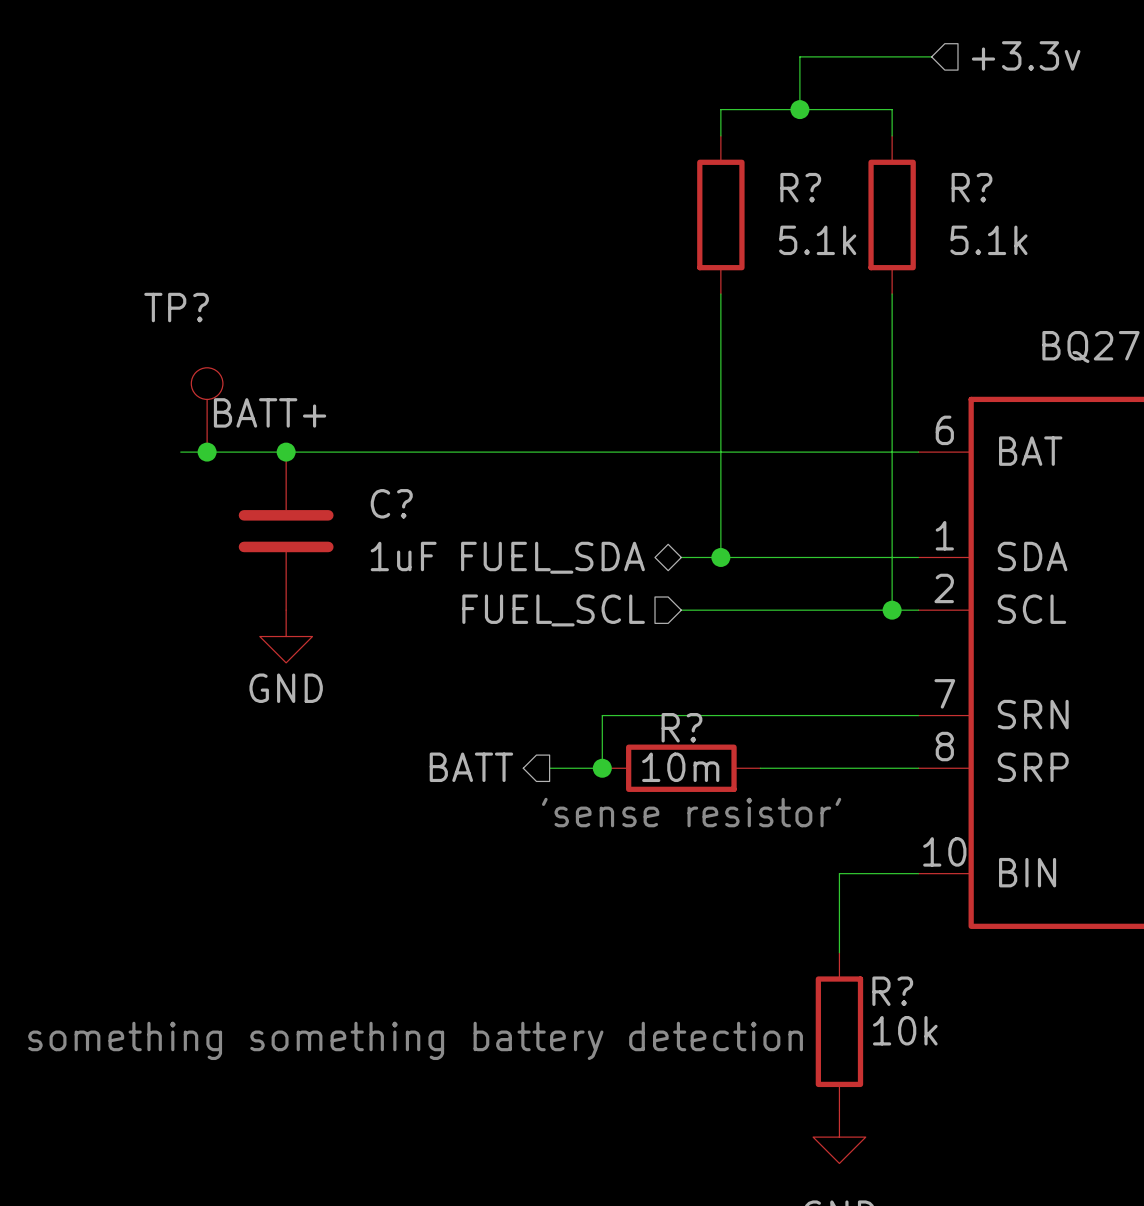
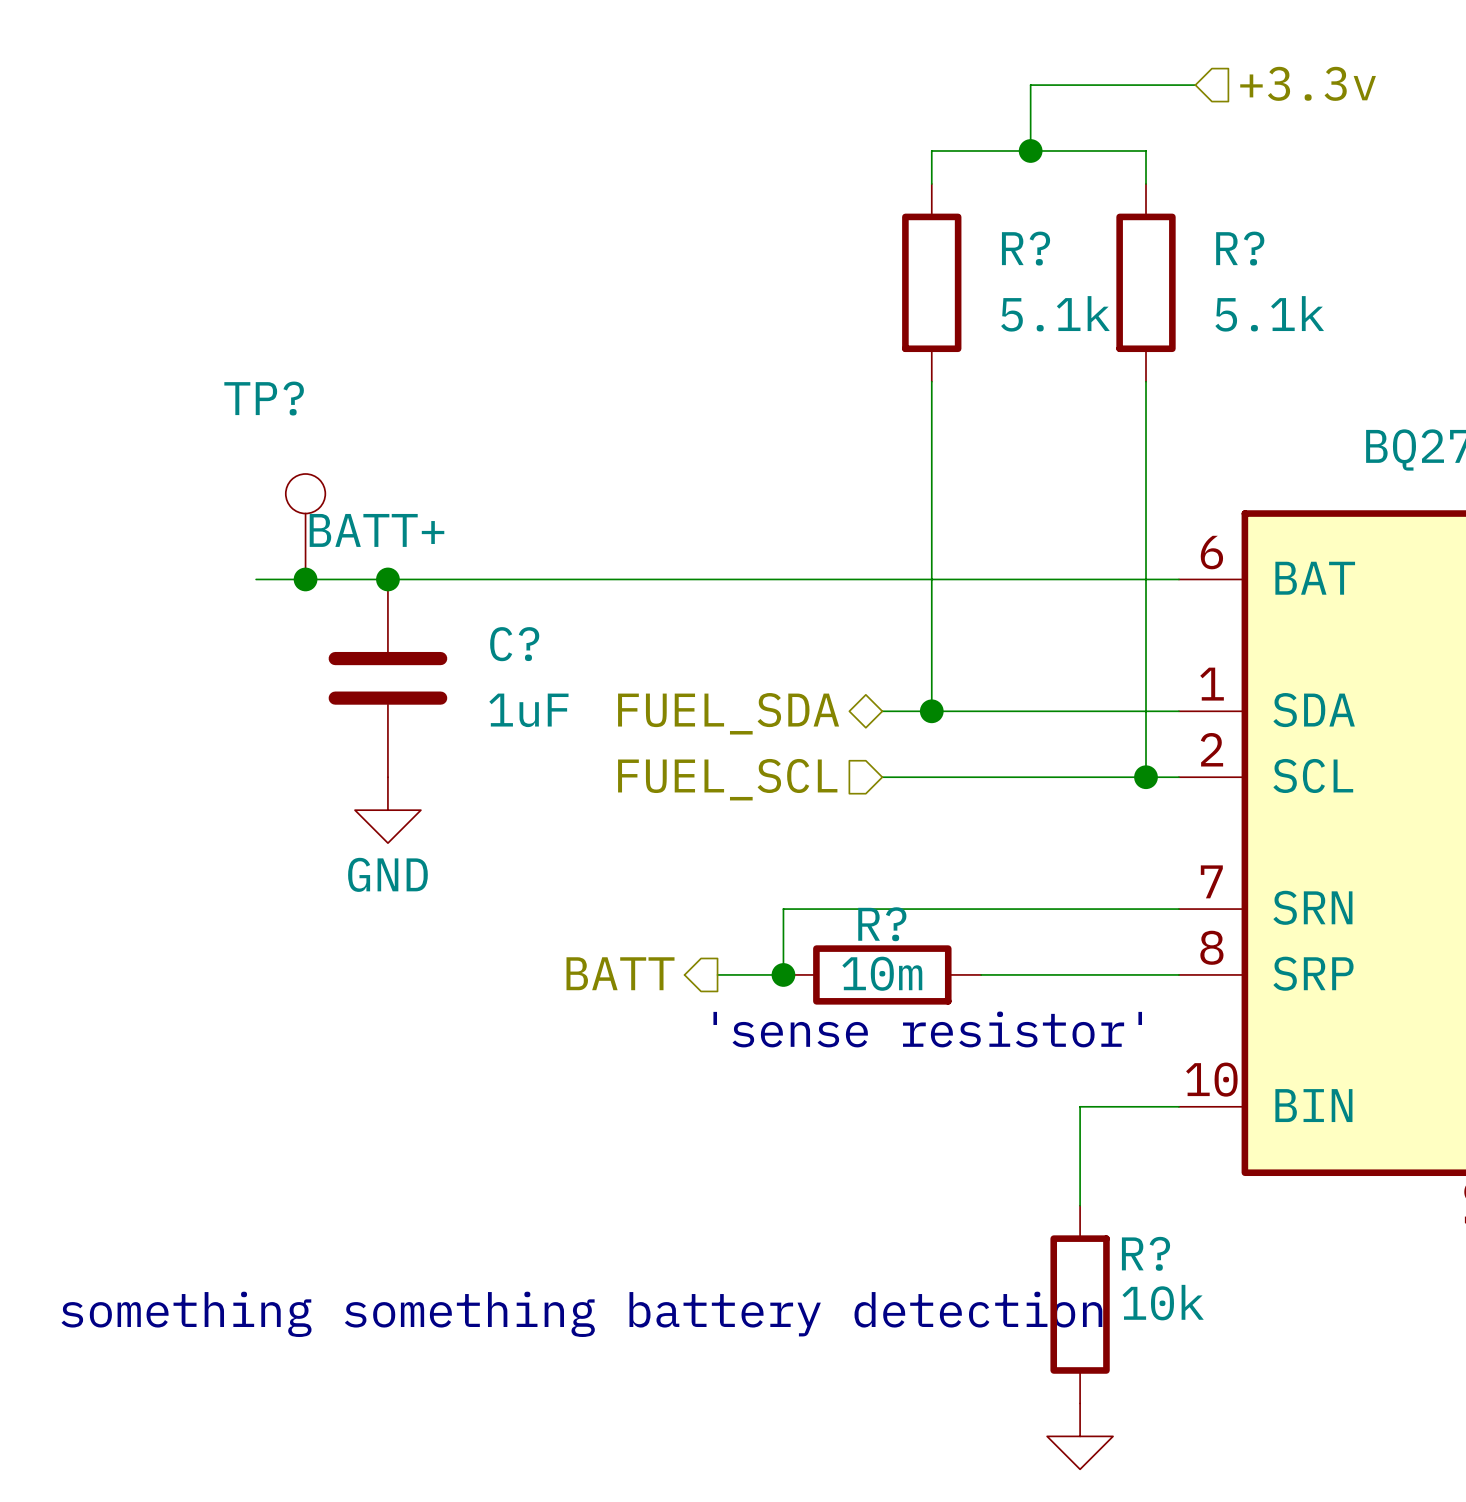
TP? position: (207, 409) -> (305, 526)
junction position: (207, 452) -> (305, 579)

